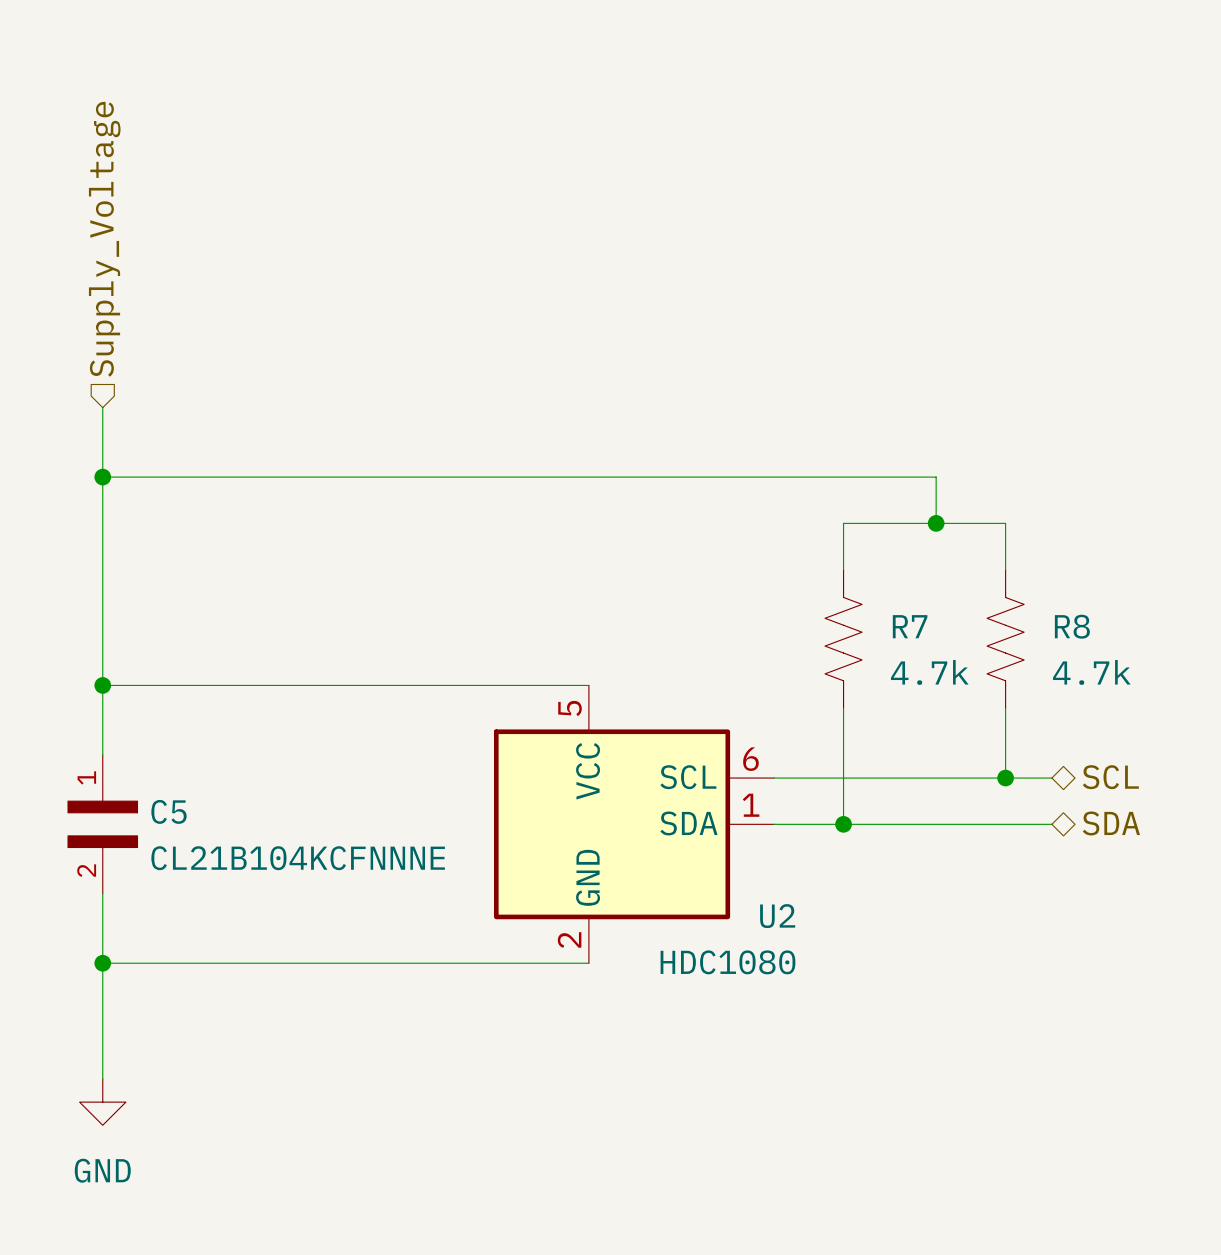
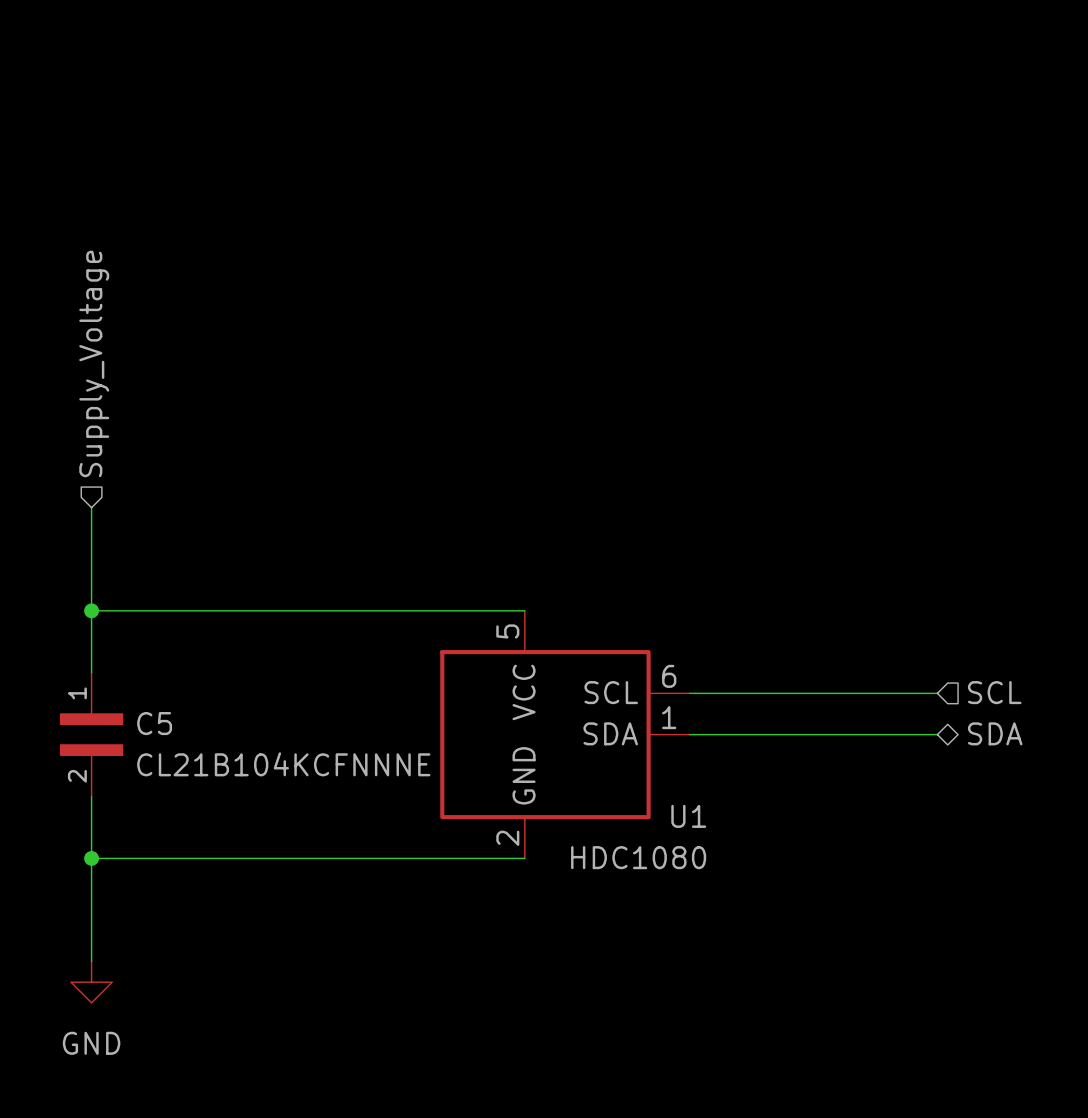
hierarchical label position: Supply_Voltage (104, 239) -> Supply_Voltage (94, 363)
wire: (102, 407) (102, 569) -> none
wire: (102, 477) (936, 477) (936, 523) -> none
junction: (102, 477) -> none
junction: (936, 523) -> none
wire: (843, 569) (843, 523) (1005, 523) (1005, 569) -> none
R7: 4.7k (843, 639) -> none
R8: 4.7k (1005, 639) -> none
wire: (843, 708) (843, 824) -> none
wire: (1005, 708) (1005, 778) -> none
hierarchical label shape: bidirectional (1110, 777) -> input (994, 692)
junction: (1005, 778) -> none
junction: (843, 824) -> none
U2 name: U2 (777, 916) -> U1 (688, 816)

